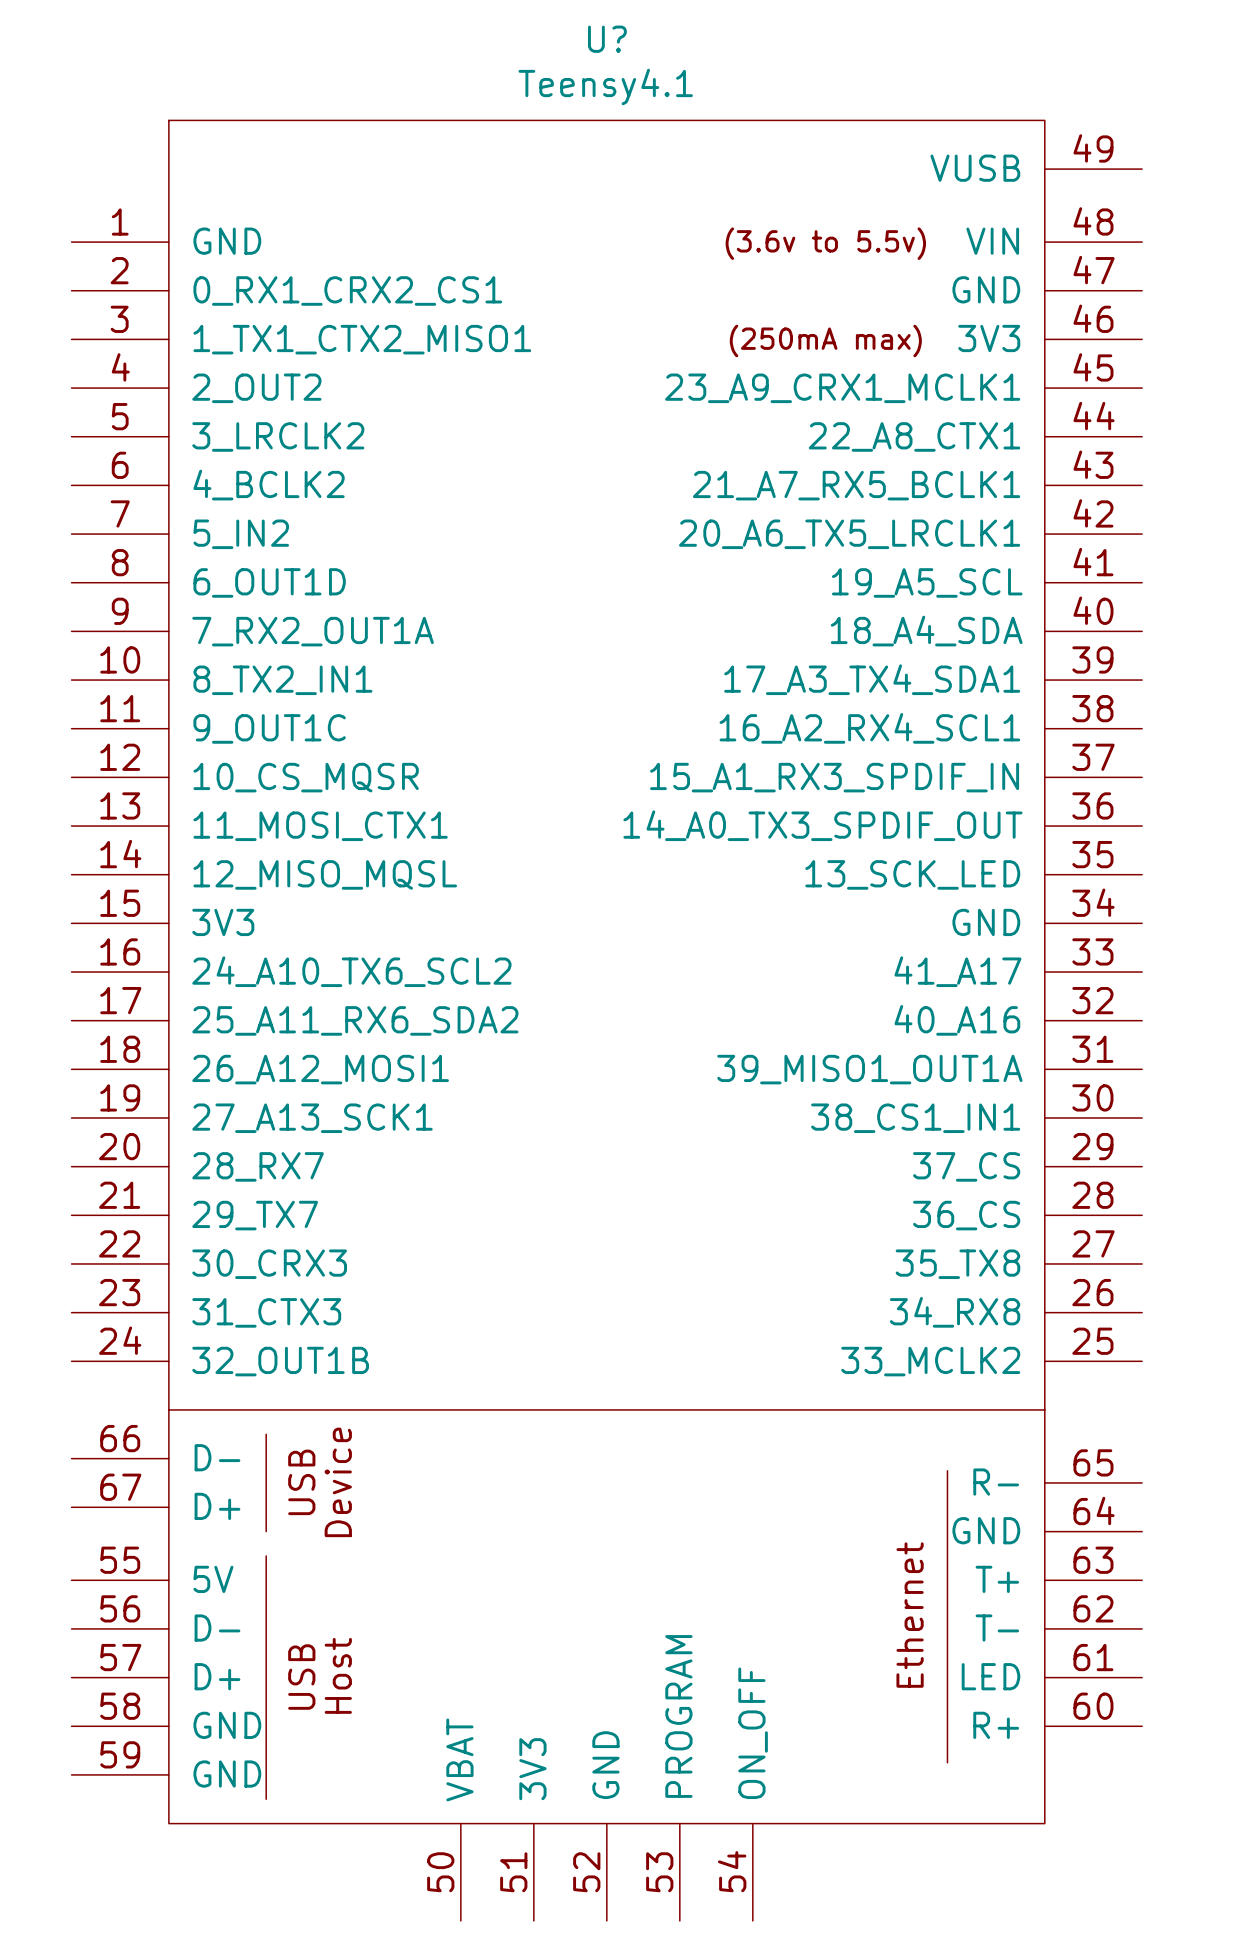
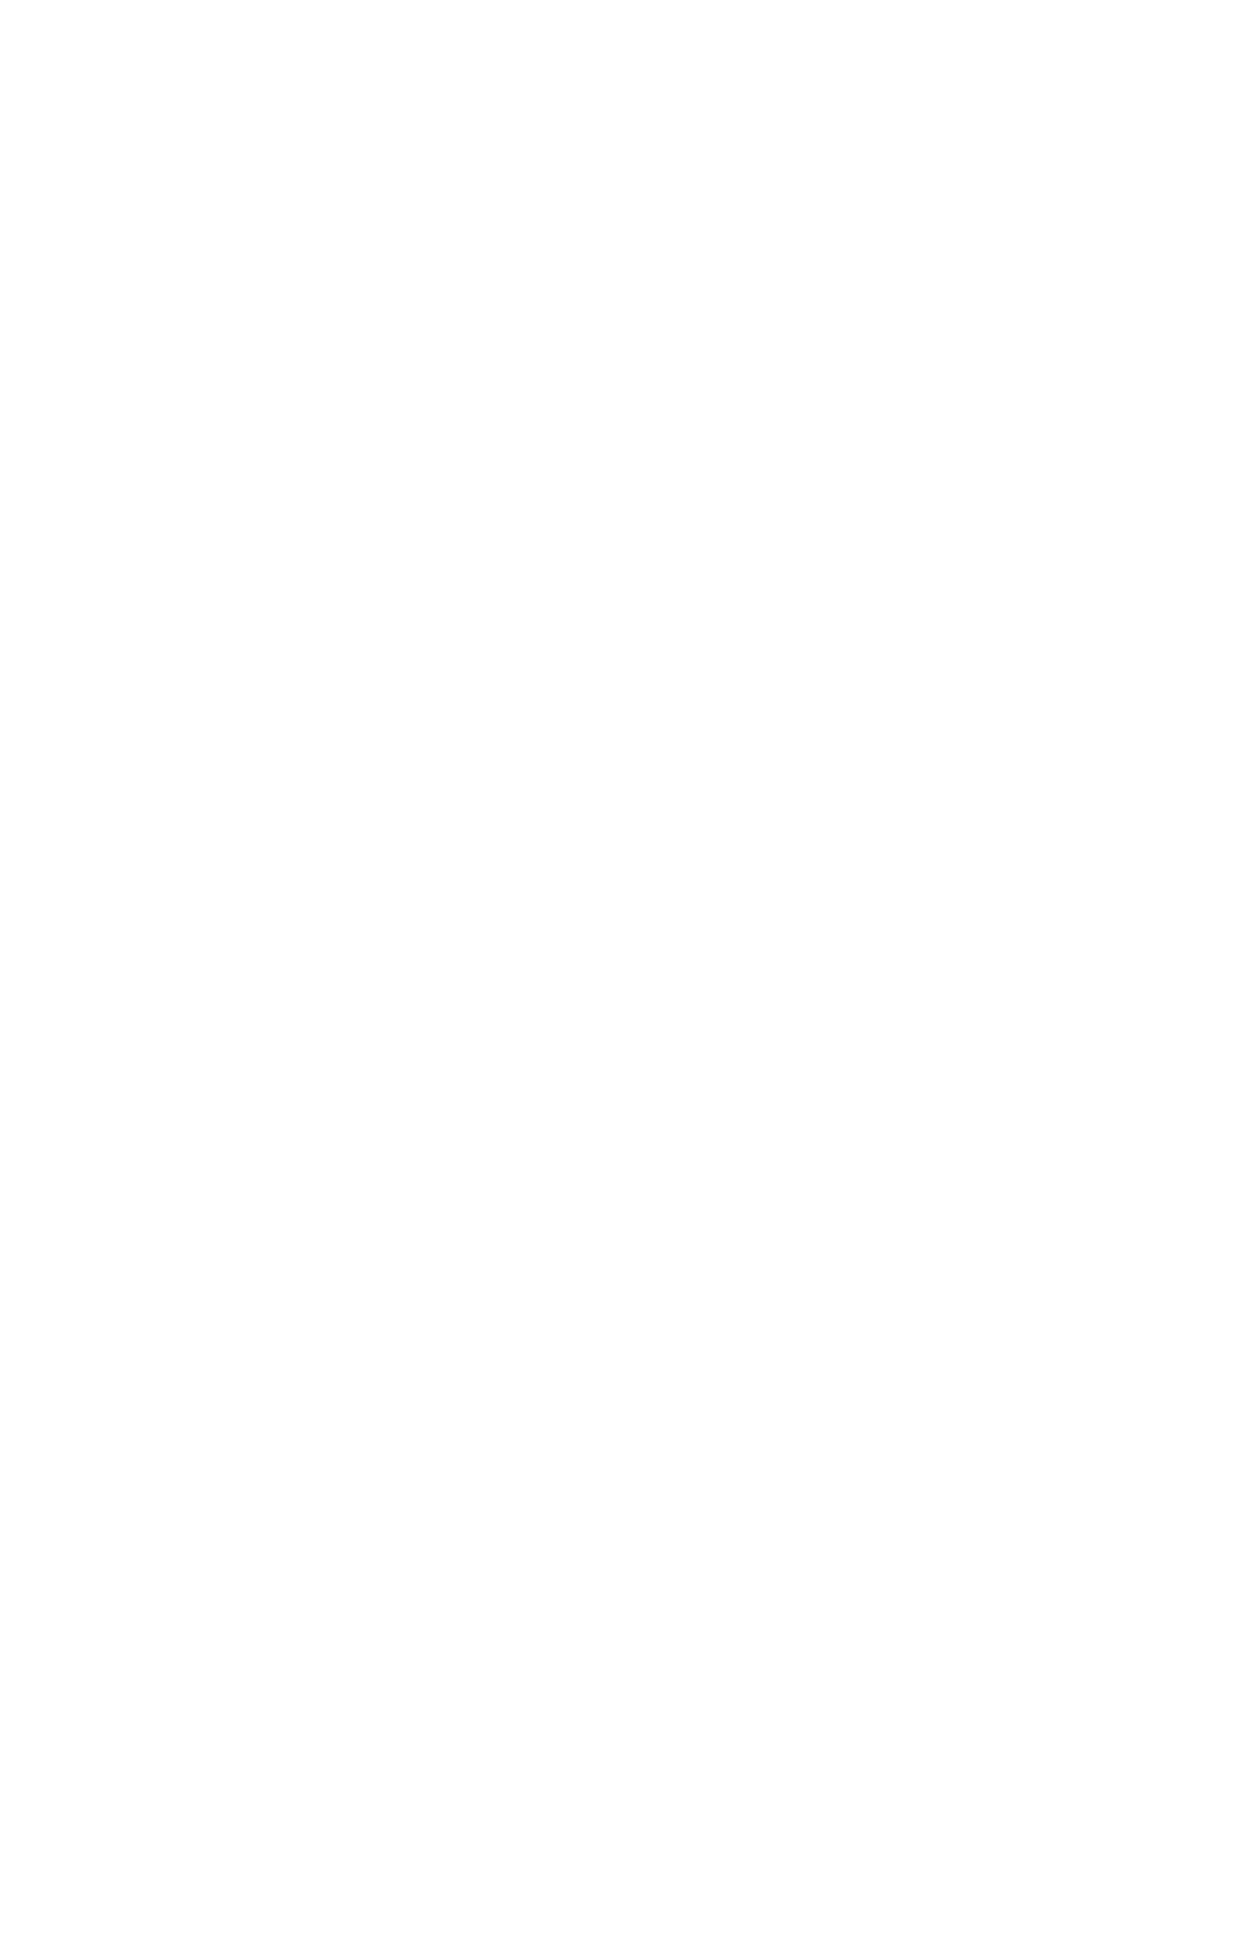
U?: Teensy4.1 (606, 1020) -> none

